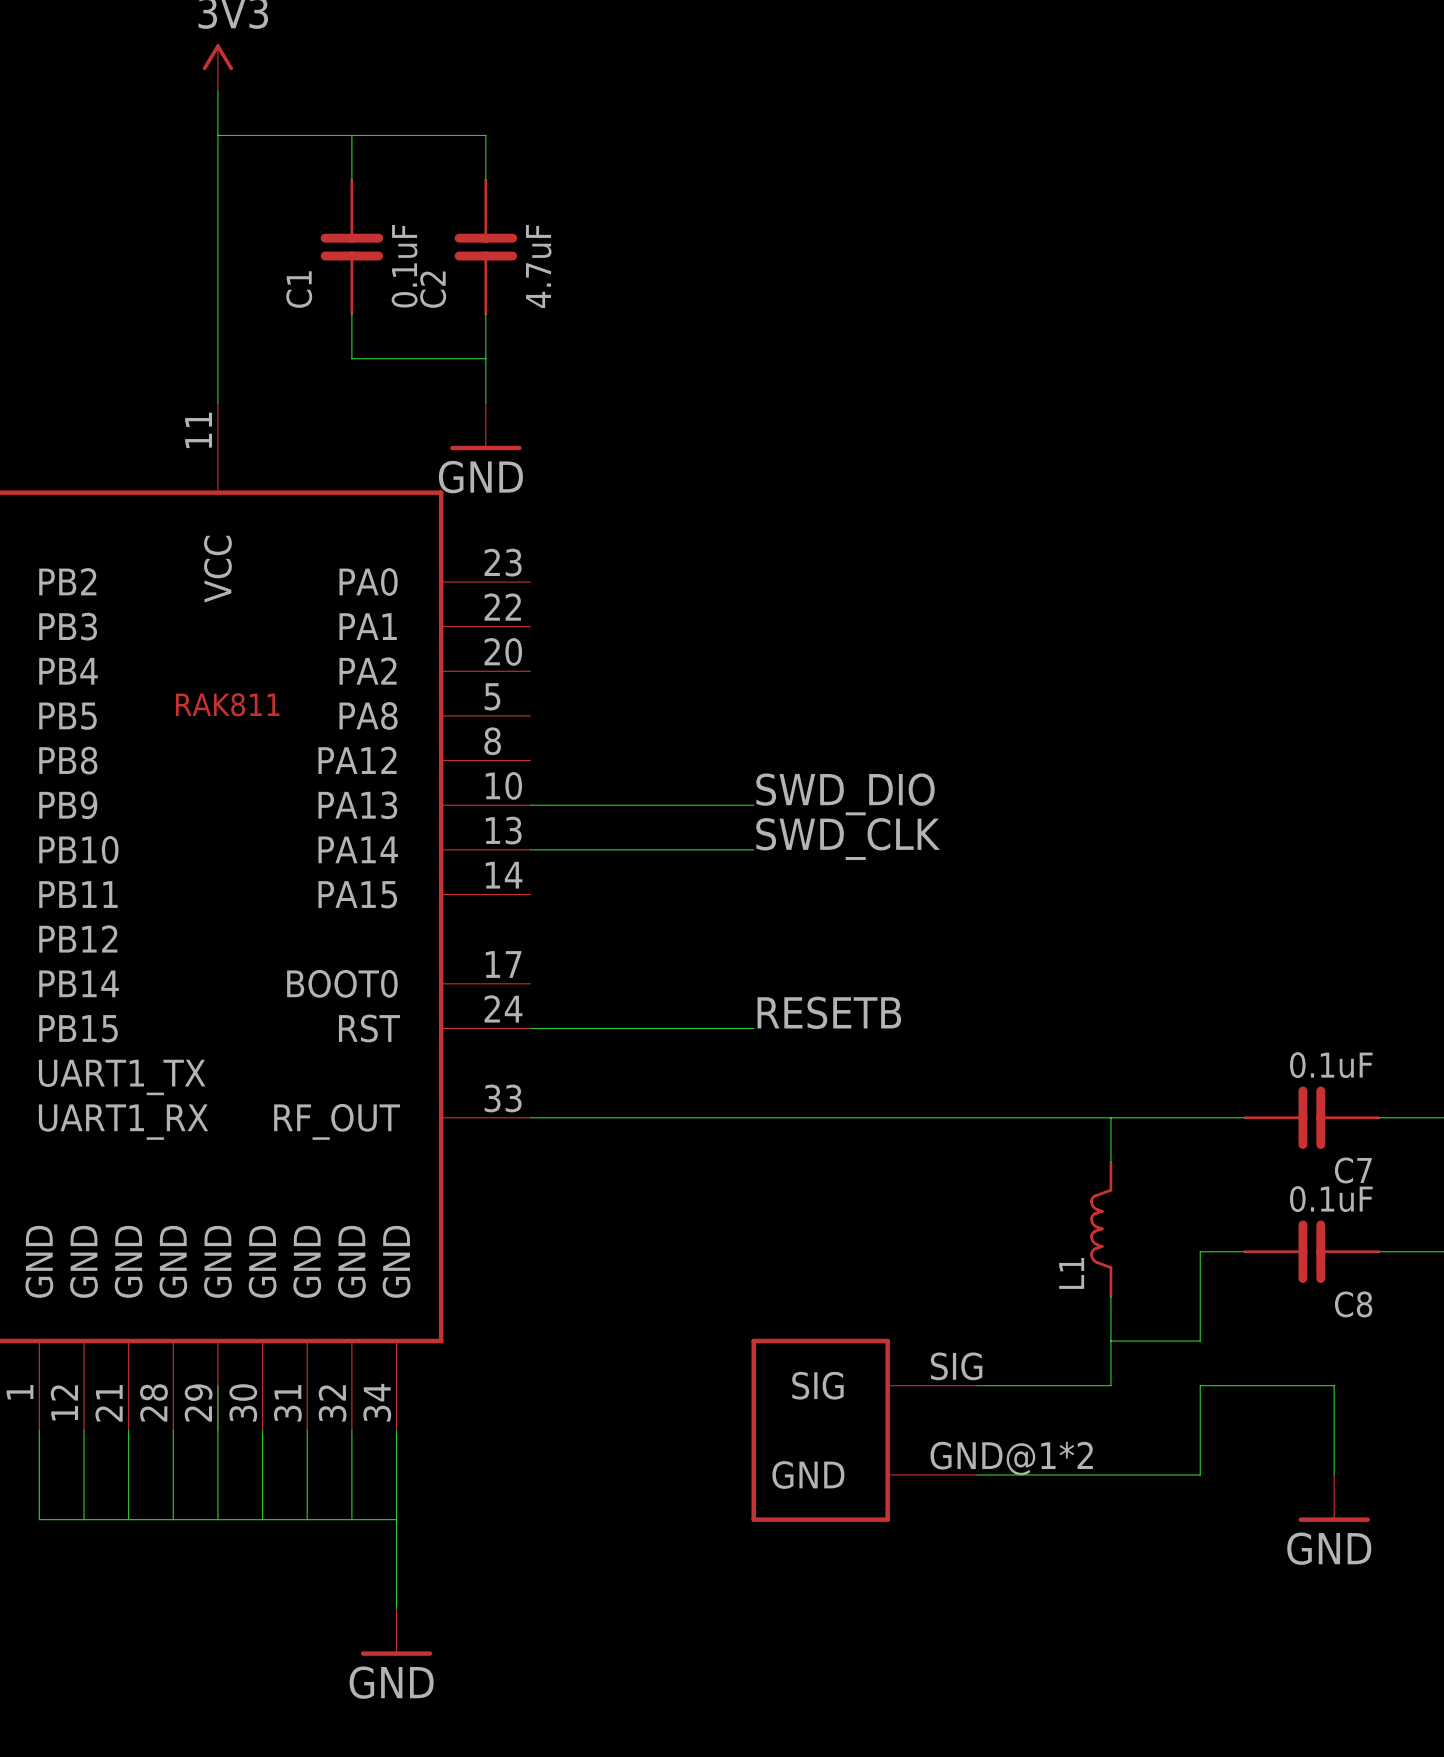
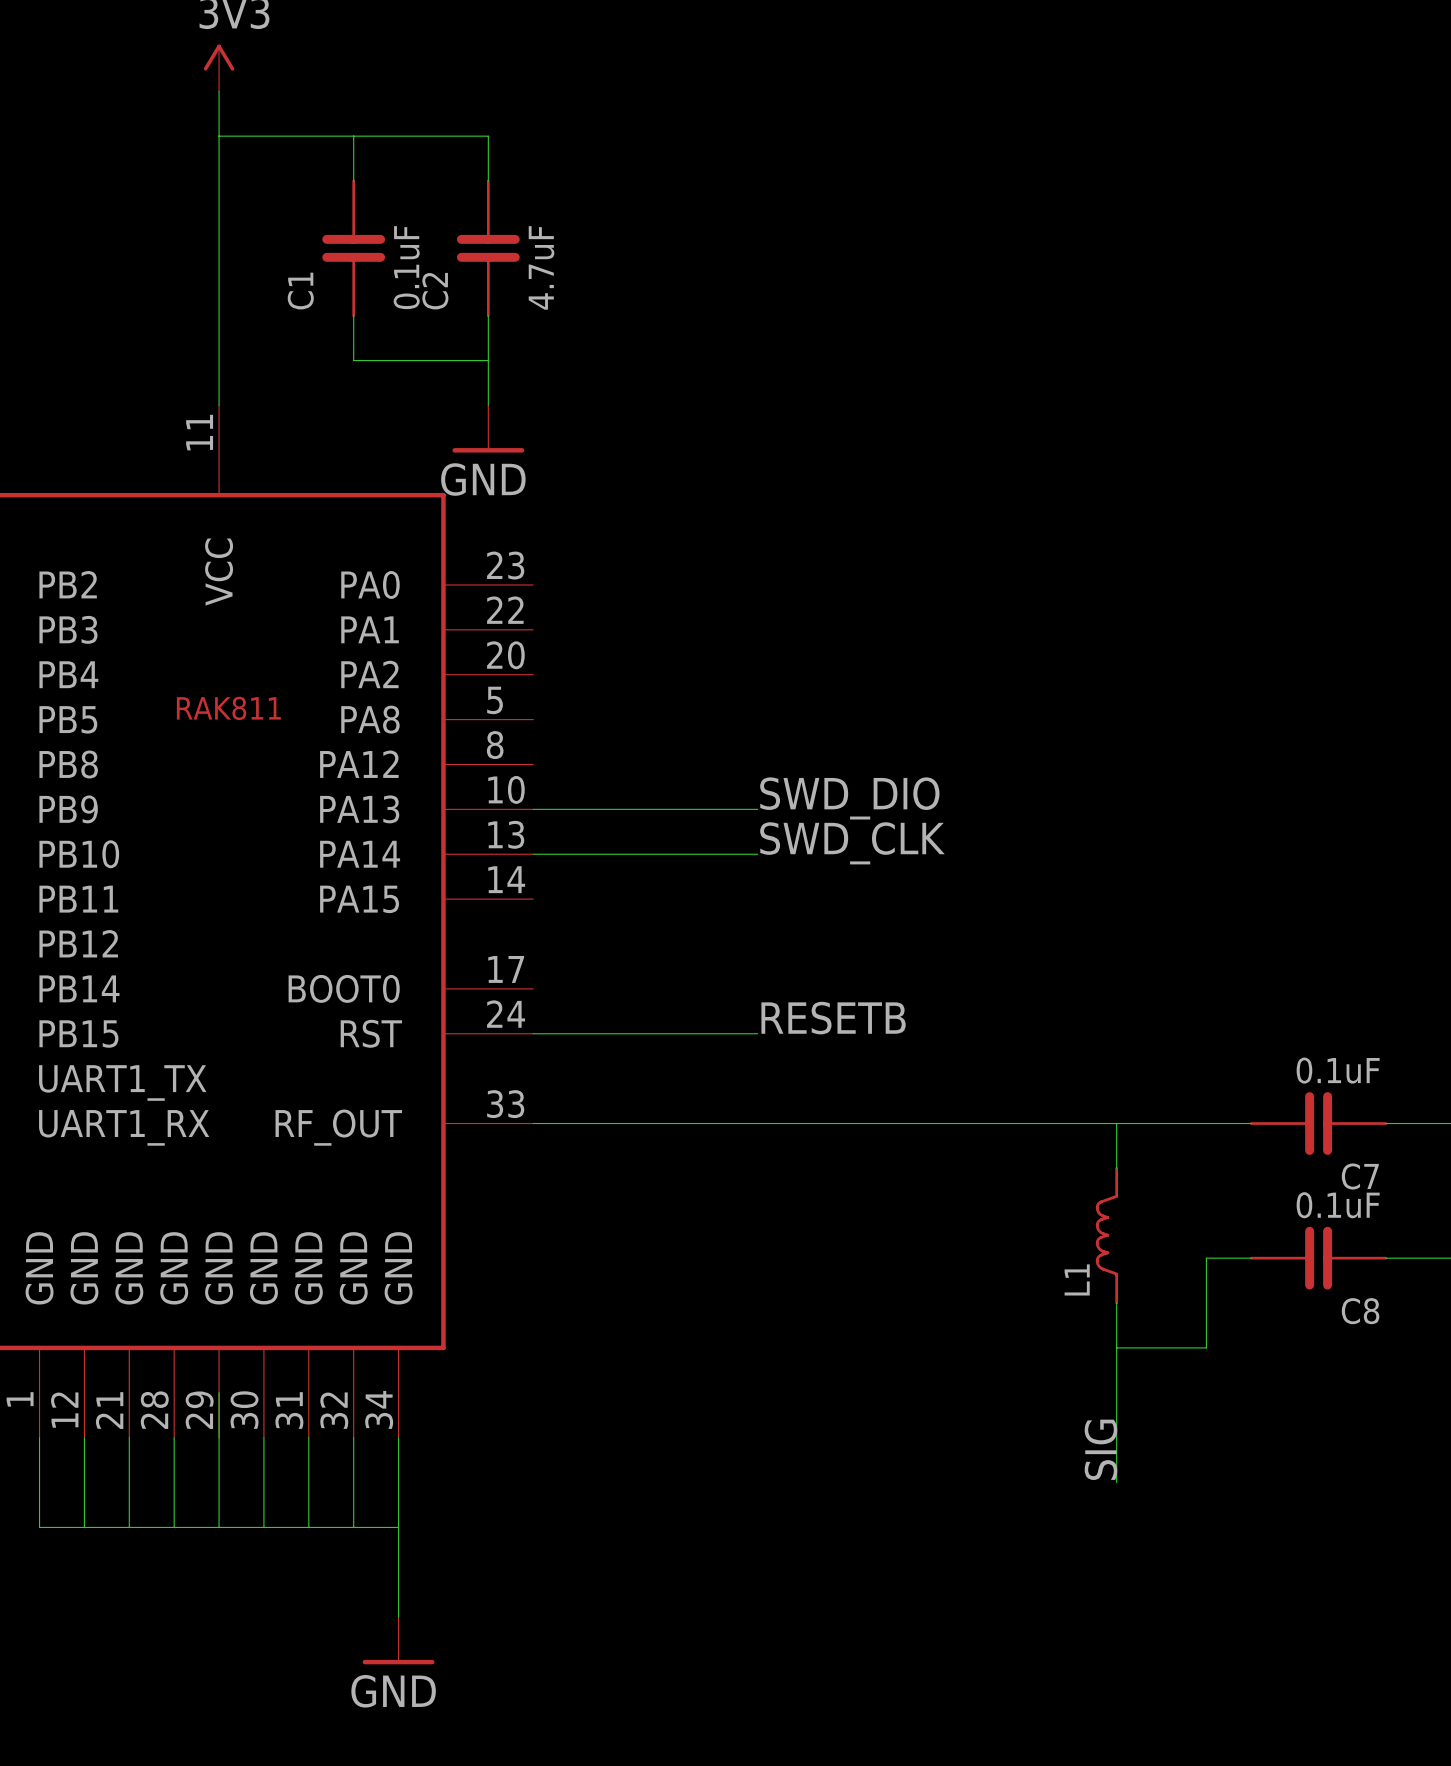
wire: (977, 1385) (1110, 1385) -> (1116, 1482) (1116, 1392)
part: (864, 1430) -> none
label: none -> SIG (1100, 1449)
wire: (977, 1474) (1200, 1474) (1200, 1385) (1334, 1385) (1334, 1474) -> none
power symbol: GND (1334, 1498) -> none

